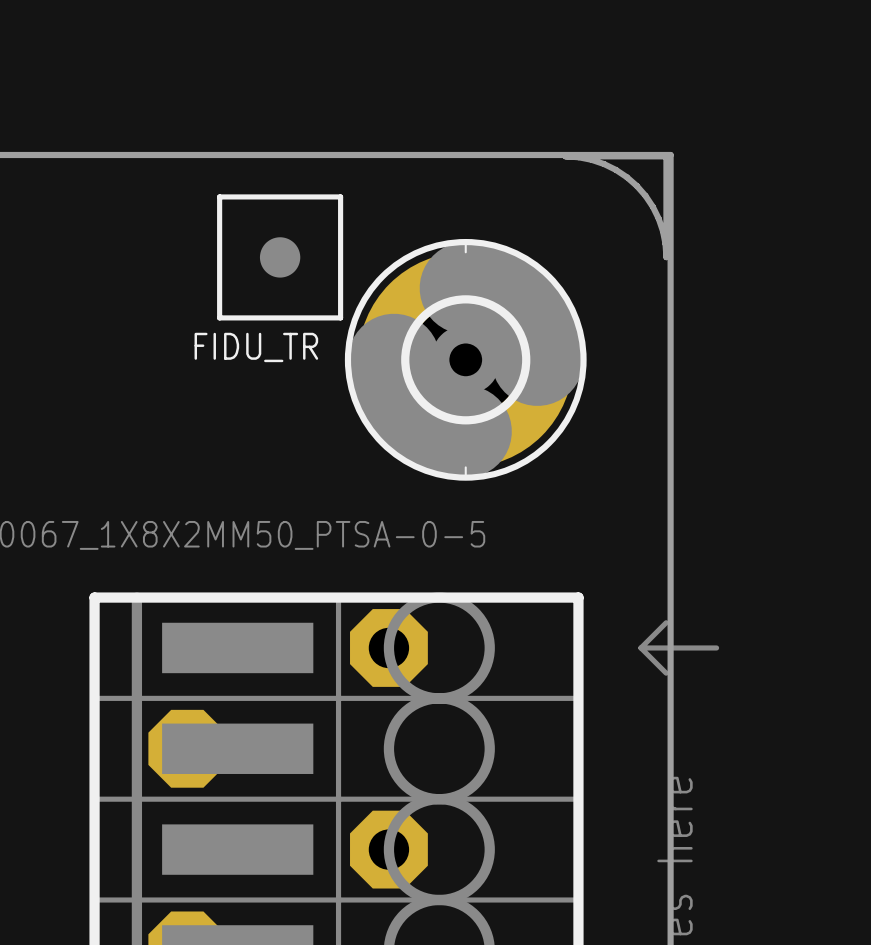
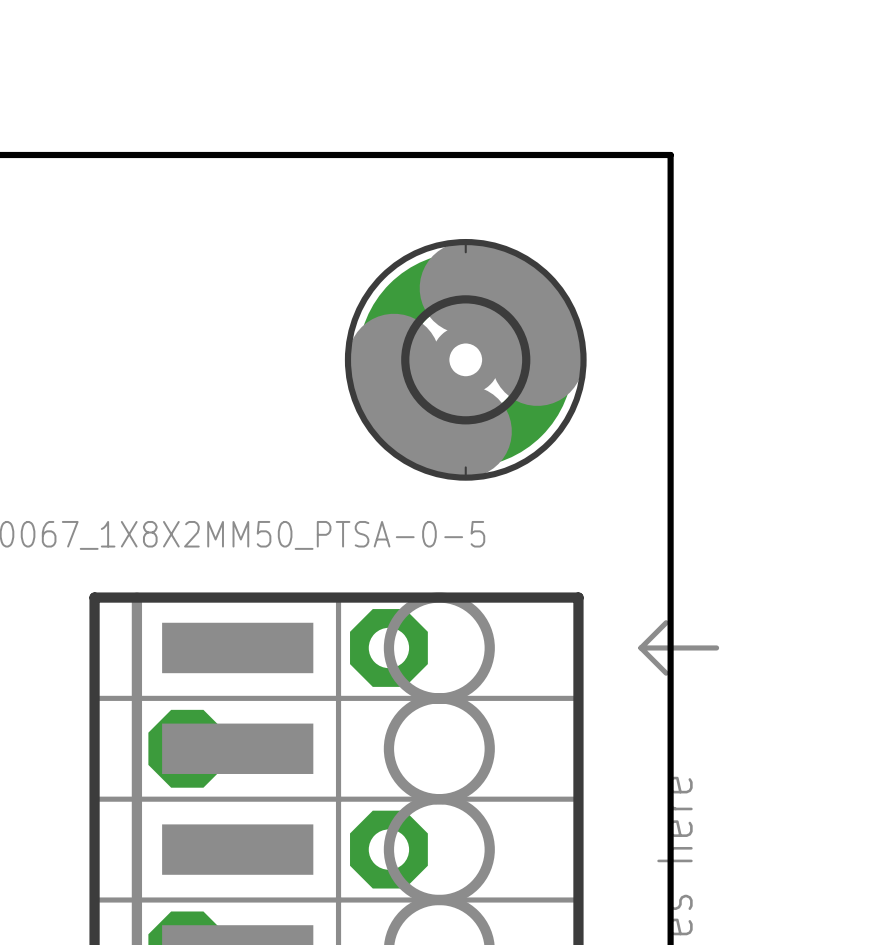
board edge: (565, 156) (666, 156) (666, 257) (665, 244) (658, 218) (652, 206) (636, 185) (615, 169) (604, 164) (578, 157) (565, 156) -> none
FIDU_TR: (280, 257) -> none

